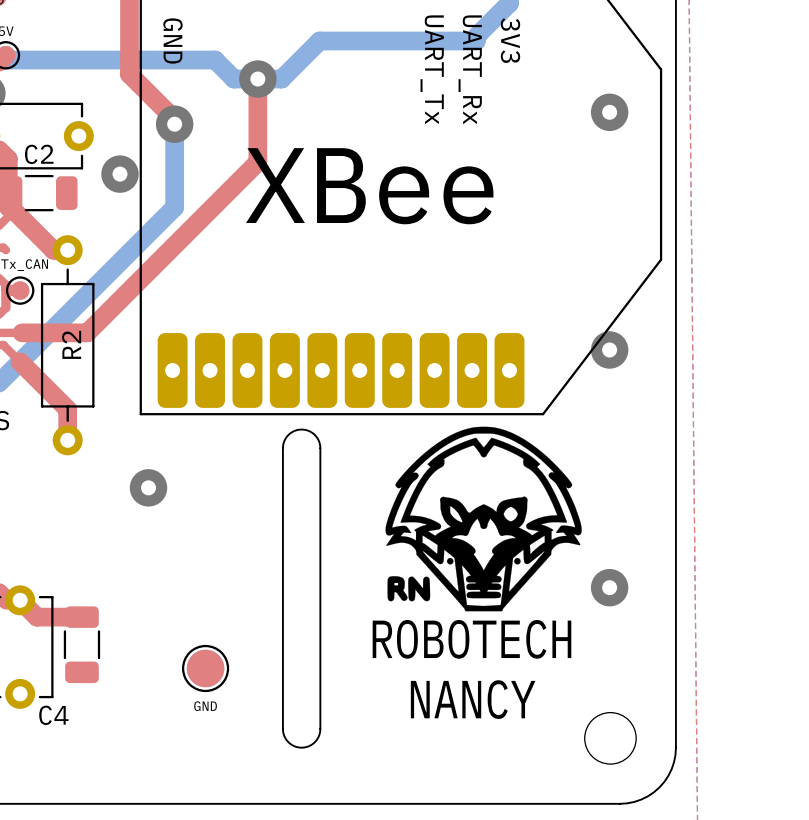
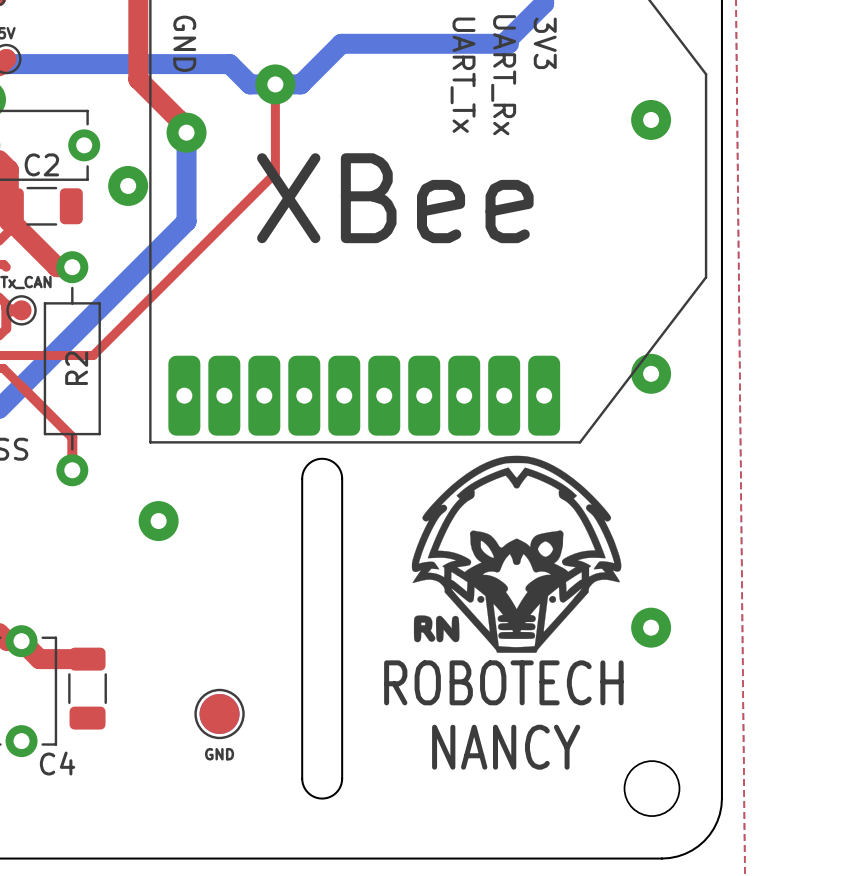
top track width: thick (257, 79) (257, 162) (87, 332) (22, 332) -> thin (275, 84) (275, 173) (93, 355) (23, 355)
top track width: thick (20, 361) (67, 409) (67, 440) -> thin (21, 386) (72, 437) (72, 470)

